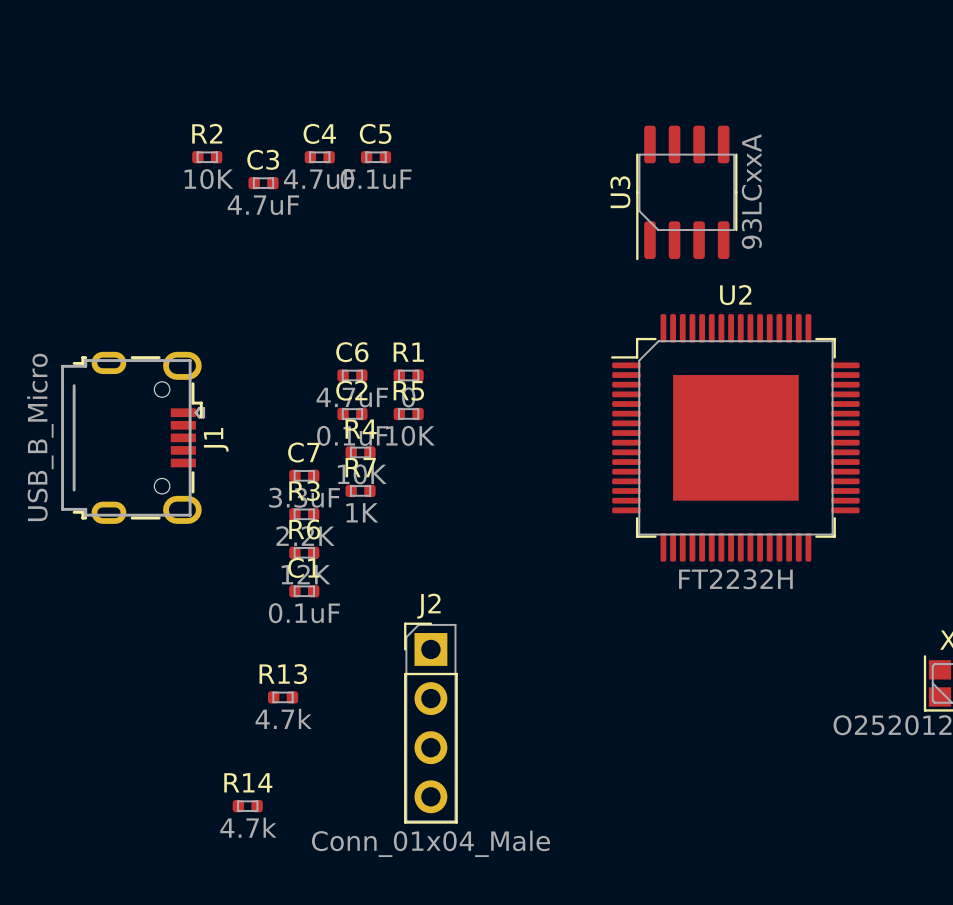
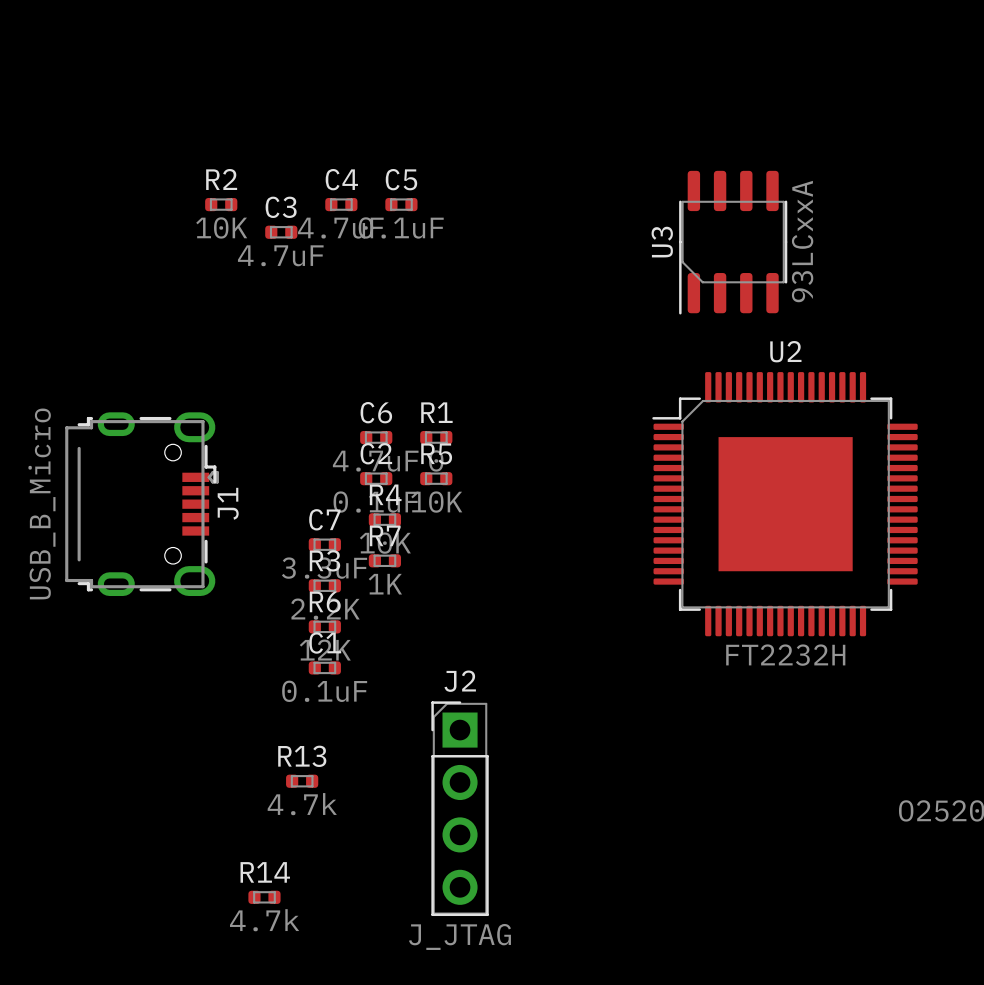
J2 value: Conn_01x04_Male (430, 843) -> J_JTAG (459, 936)

